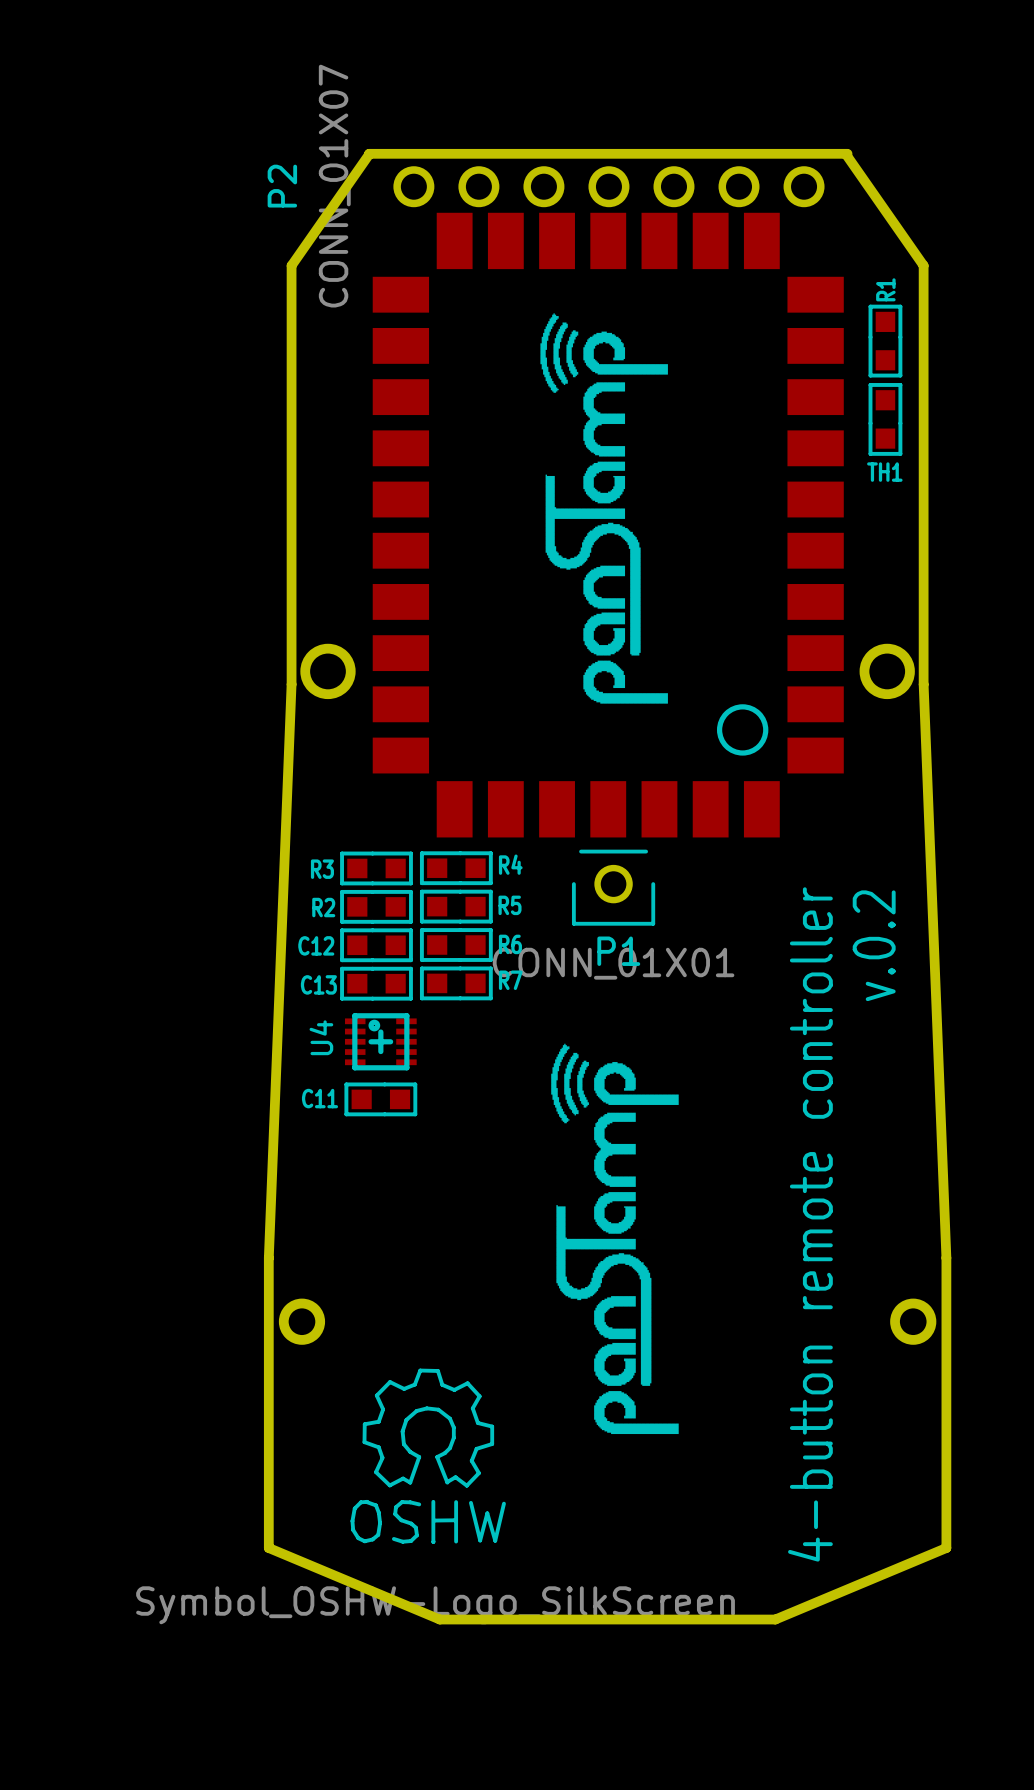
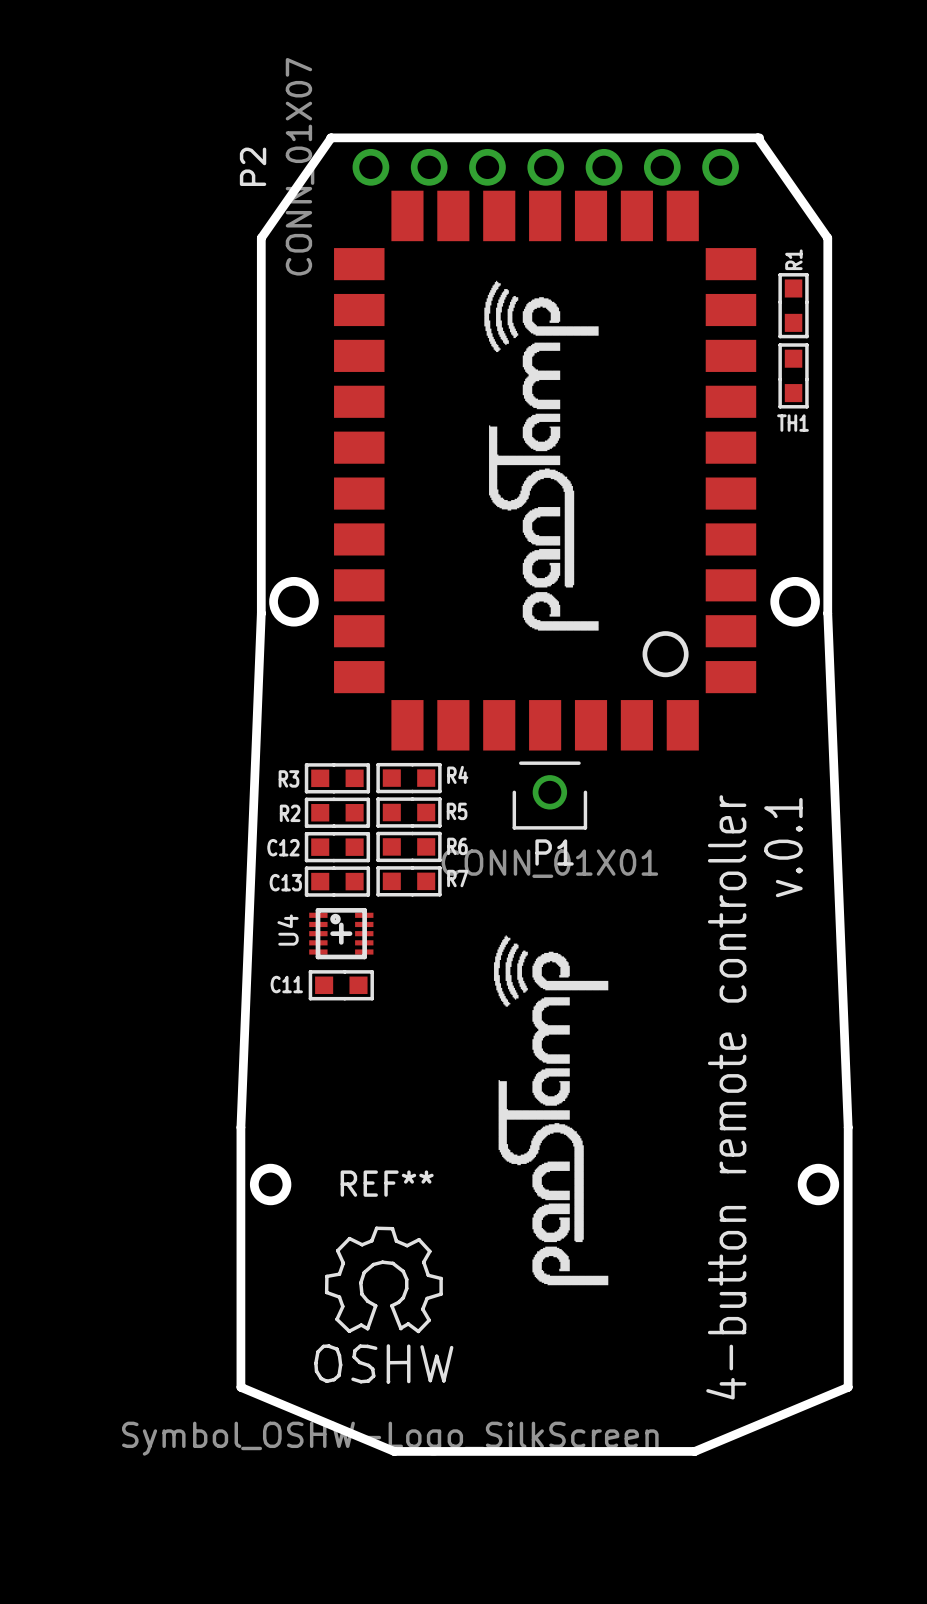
text: v.0.2 (874, 945) -> v.0.1 (783, 847)
REF**: none -> Symbol_OSHW-Logo_SilkScreen (383, 1305)

